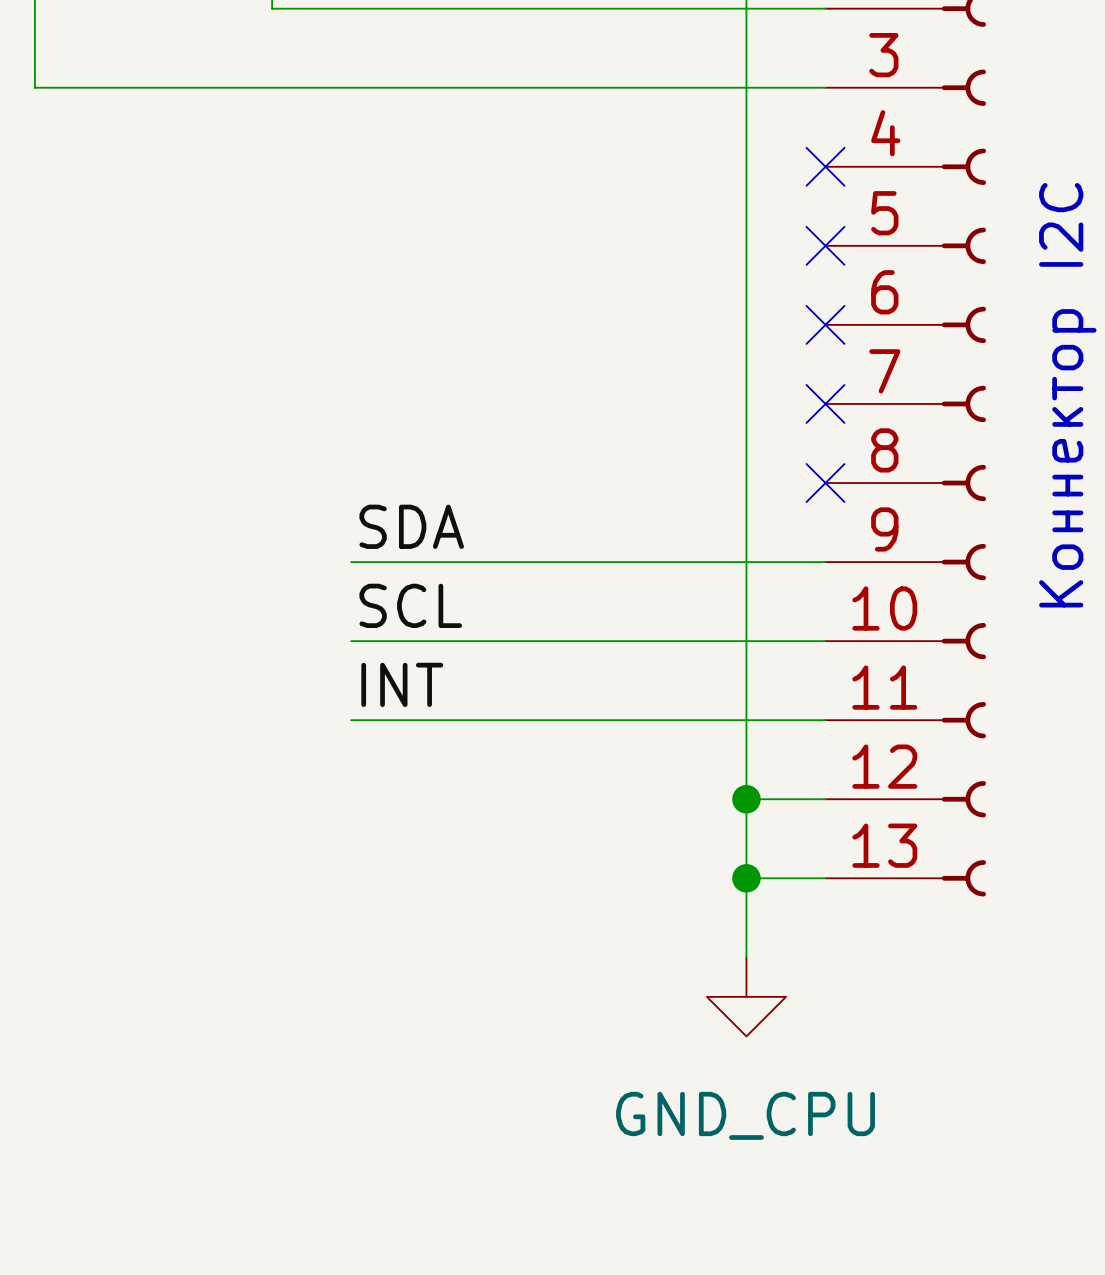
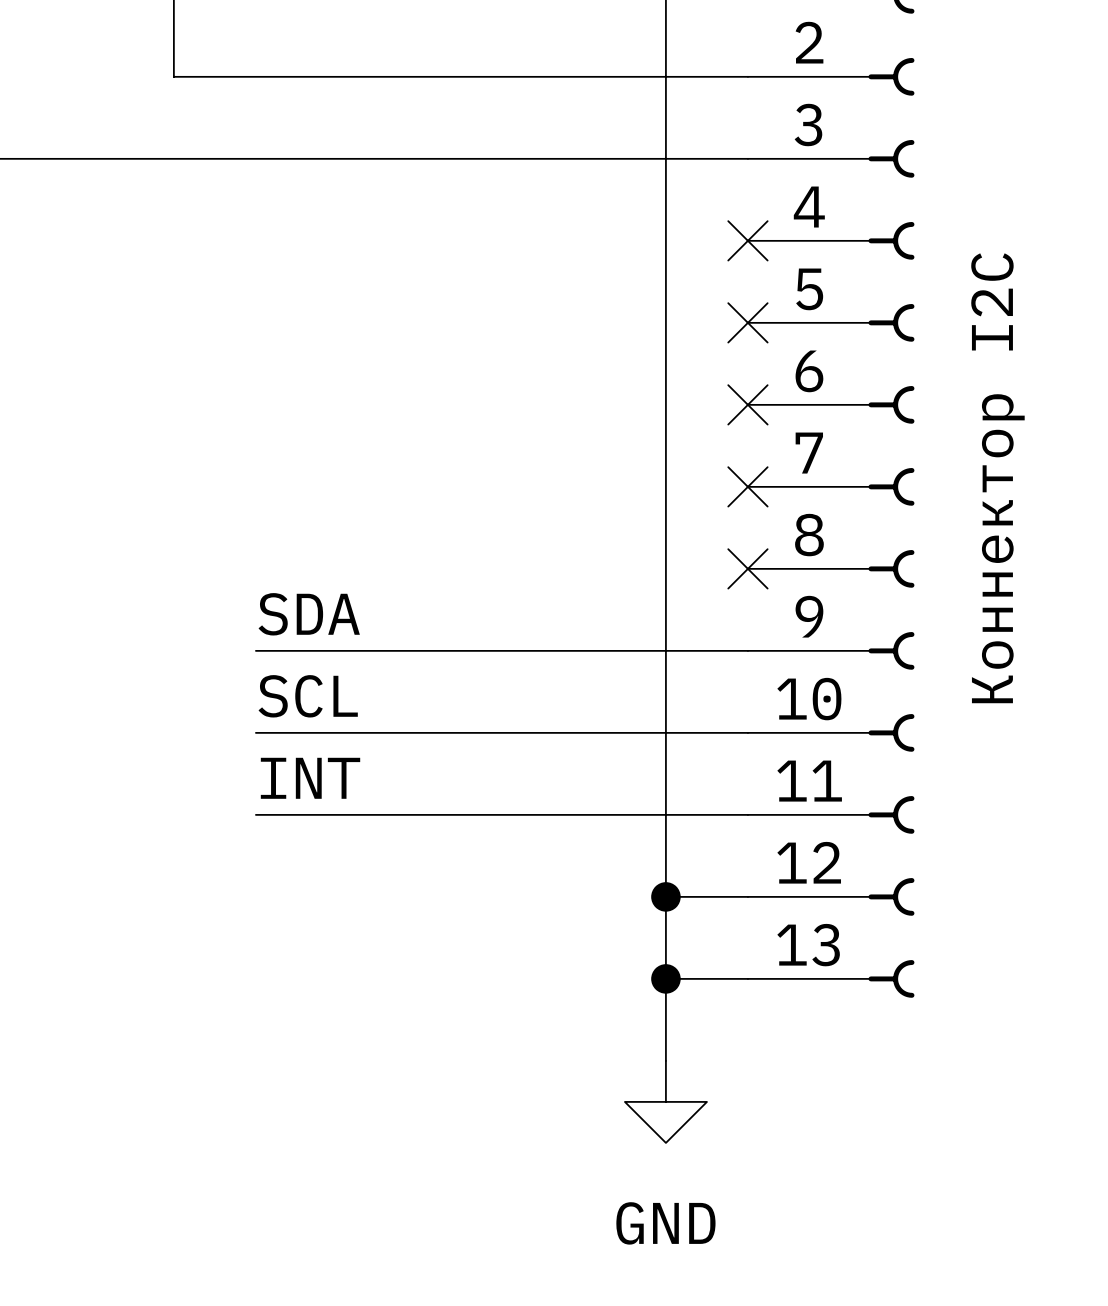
power symbol: GND_CPU (746, 996) -> GND (665, 1101)

